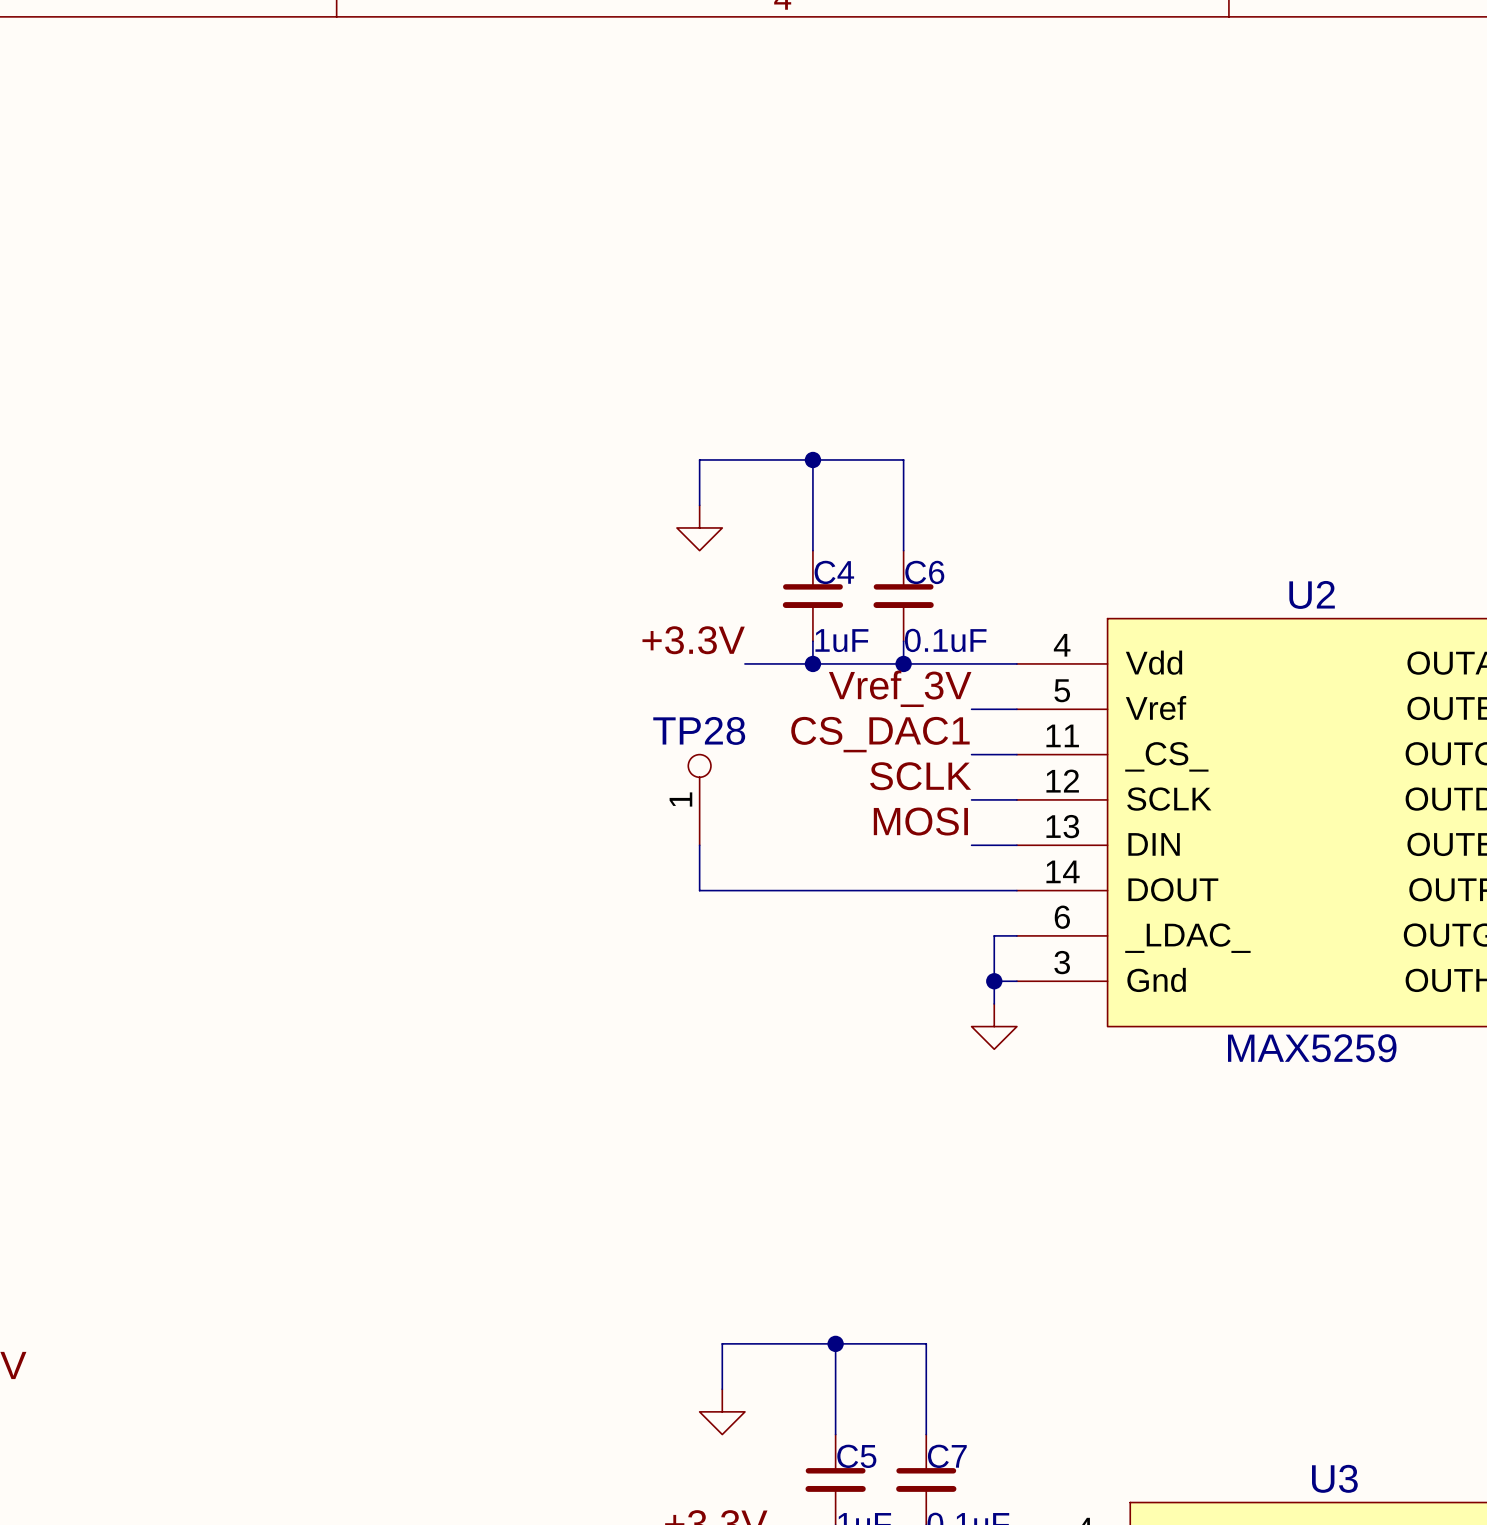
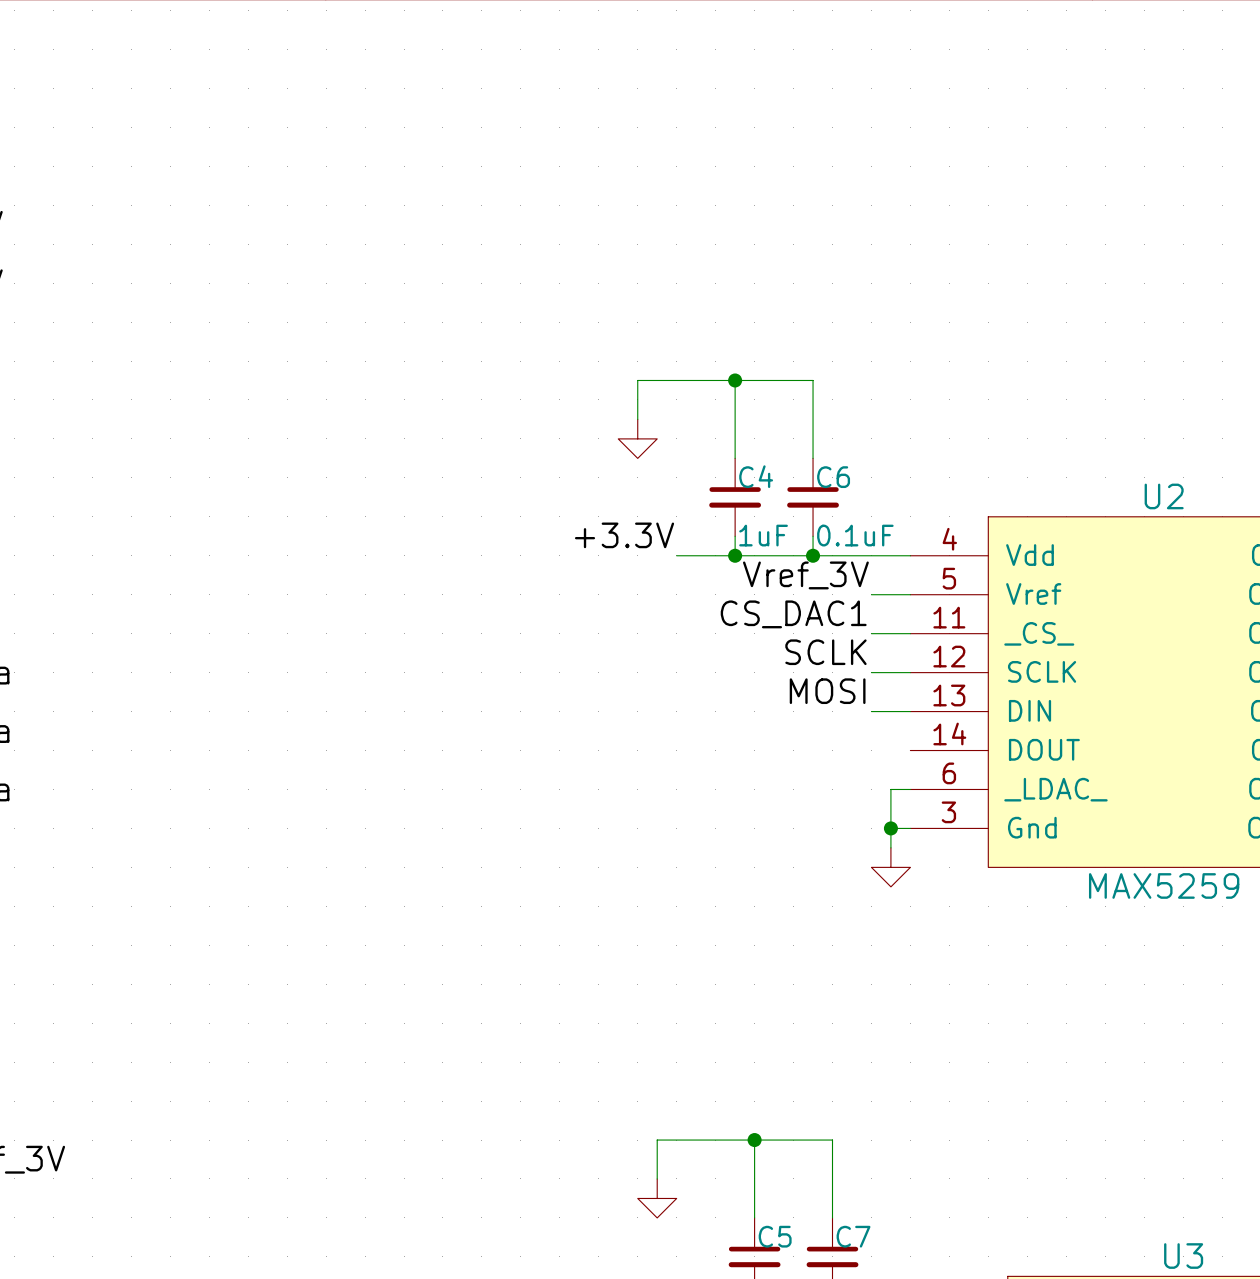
TP28: (699, 799) -> none
wire: (699, 845) (699, 890) (1016, 890) -> none

